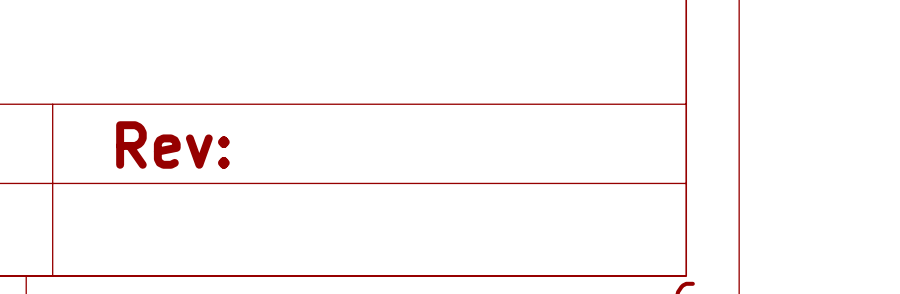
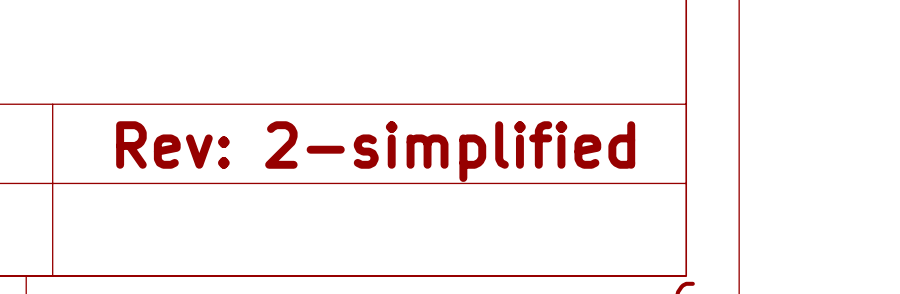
title block: Rev: (172, 145) -> Rev: 2-simplified (375, 151)

